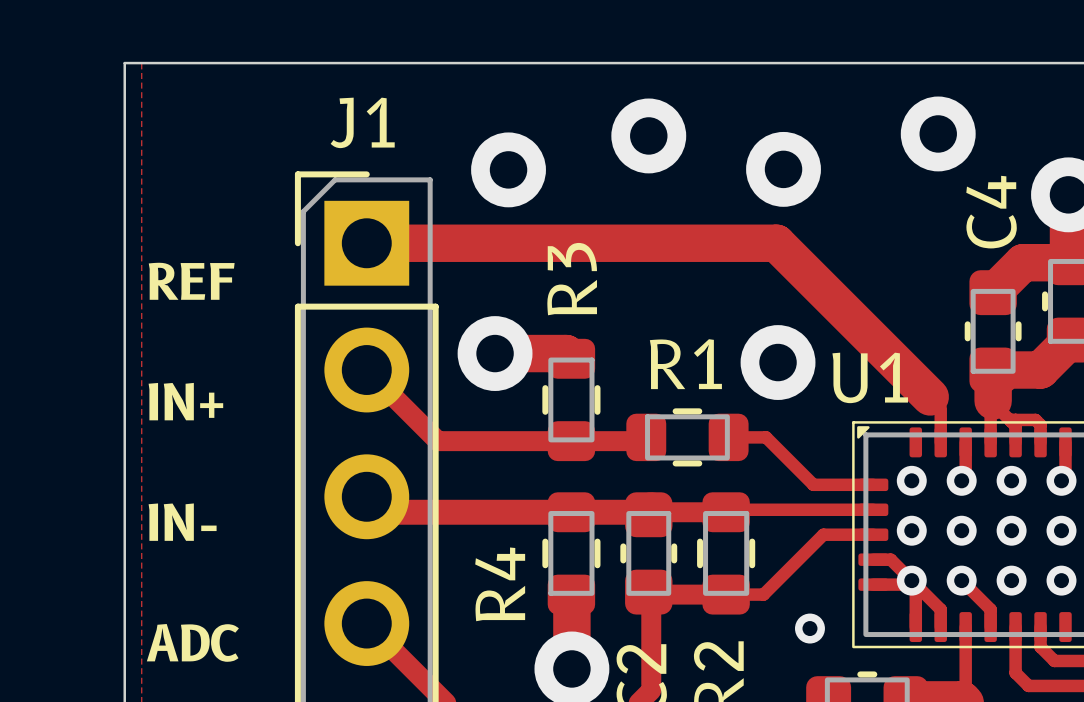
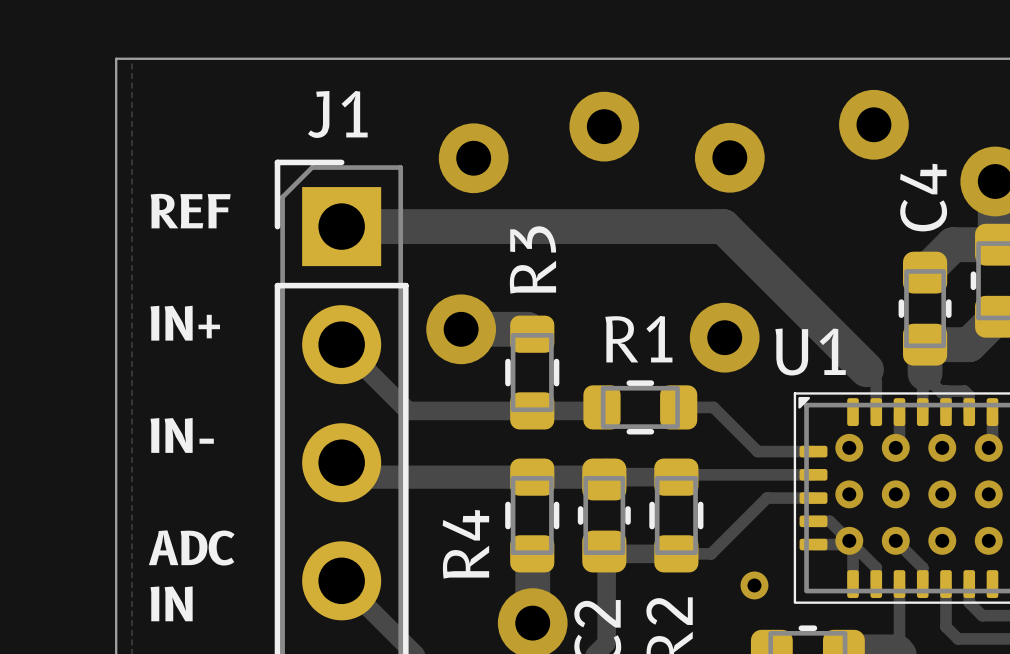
text position: REF (191, 281) -> REF (190, 211)
text position: IN+ (185, 401) -> IN+ (185, 323)
text position: IN- (182, 522) -> IN- (182, 435)
text: none -> ADC (191, 547)
text: ADC (192, 642) -> IN (171, 603)

